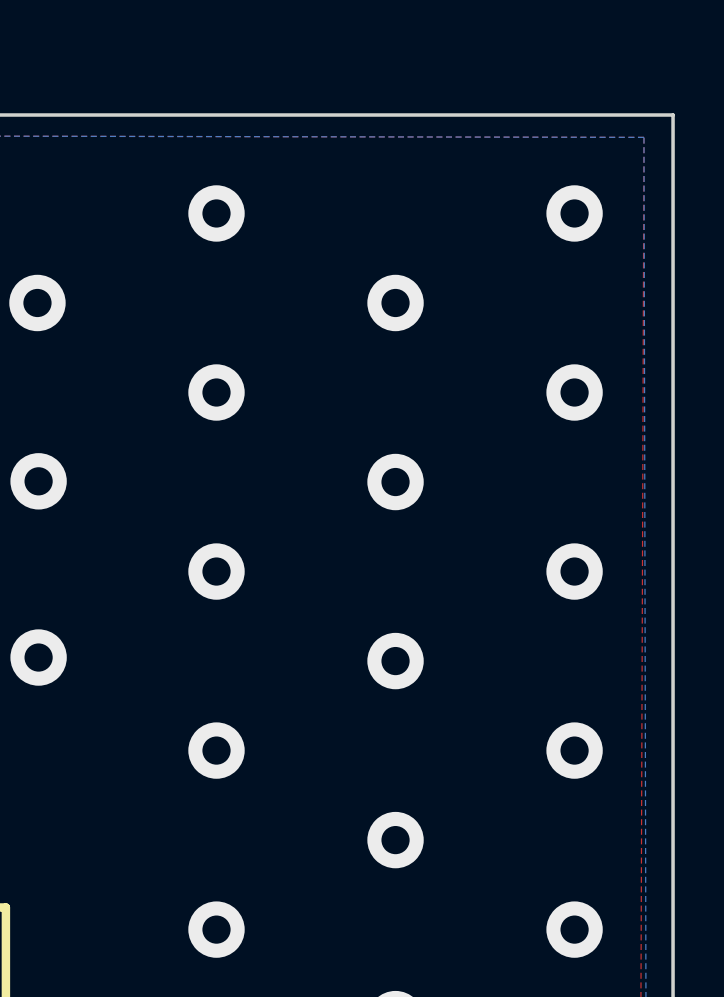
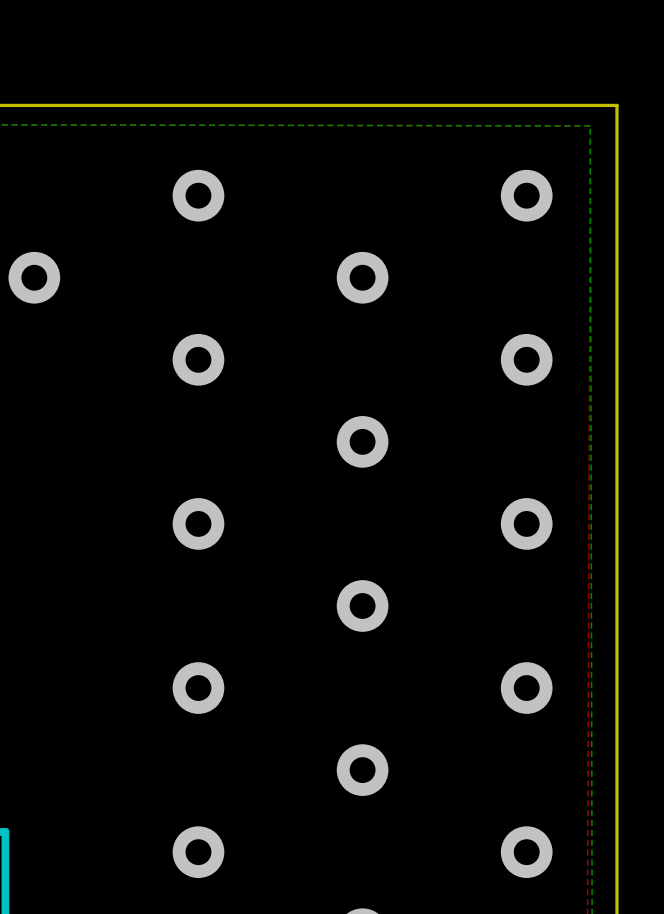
via: (38, 481) -> none
via: (38, 657) -> none

